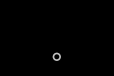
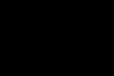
via: (56, 56) -> none

